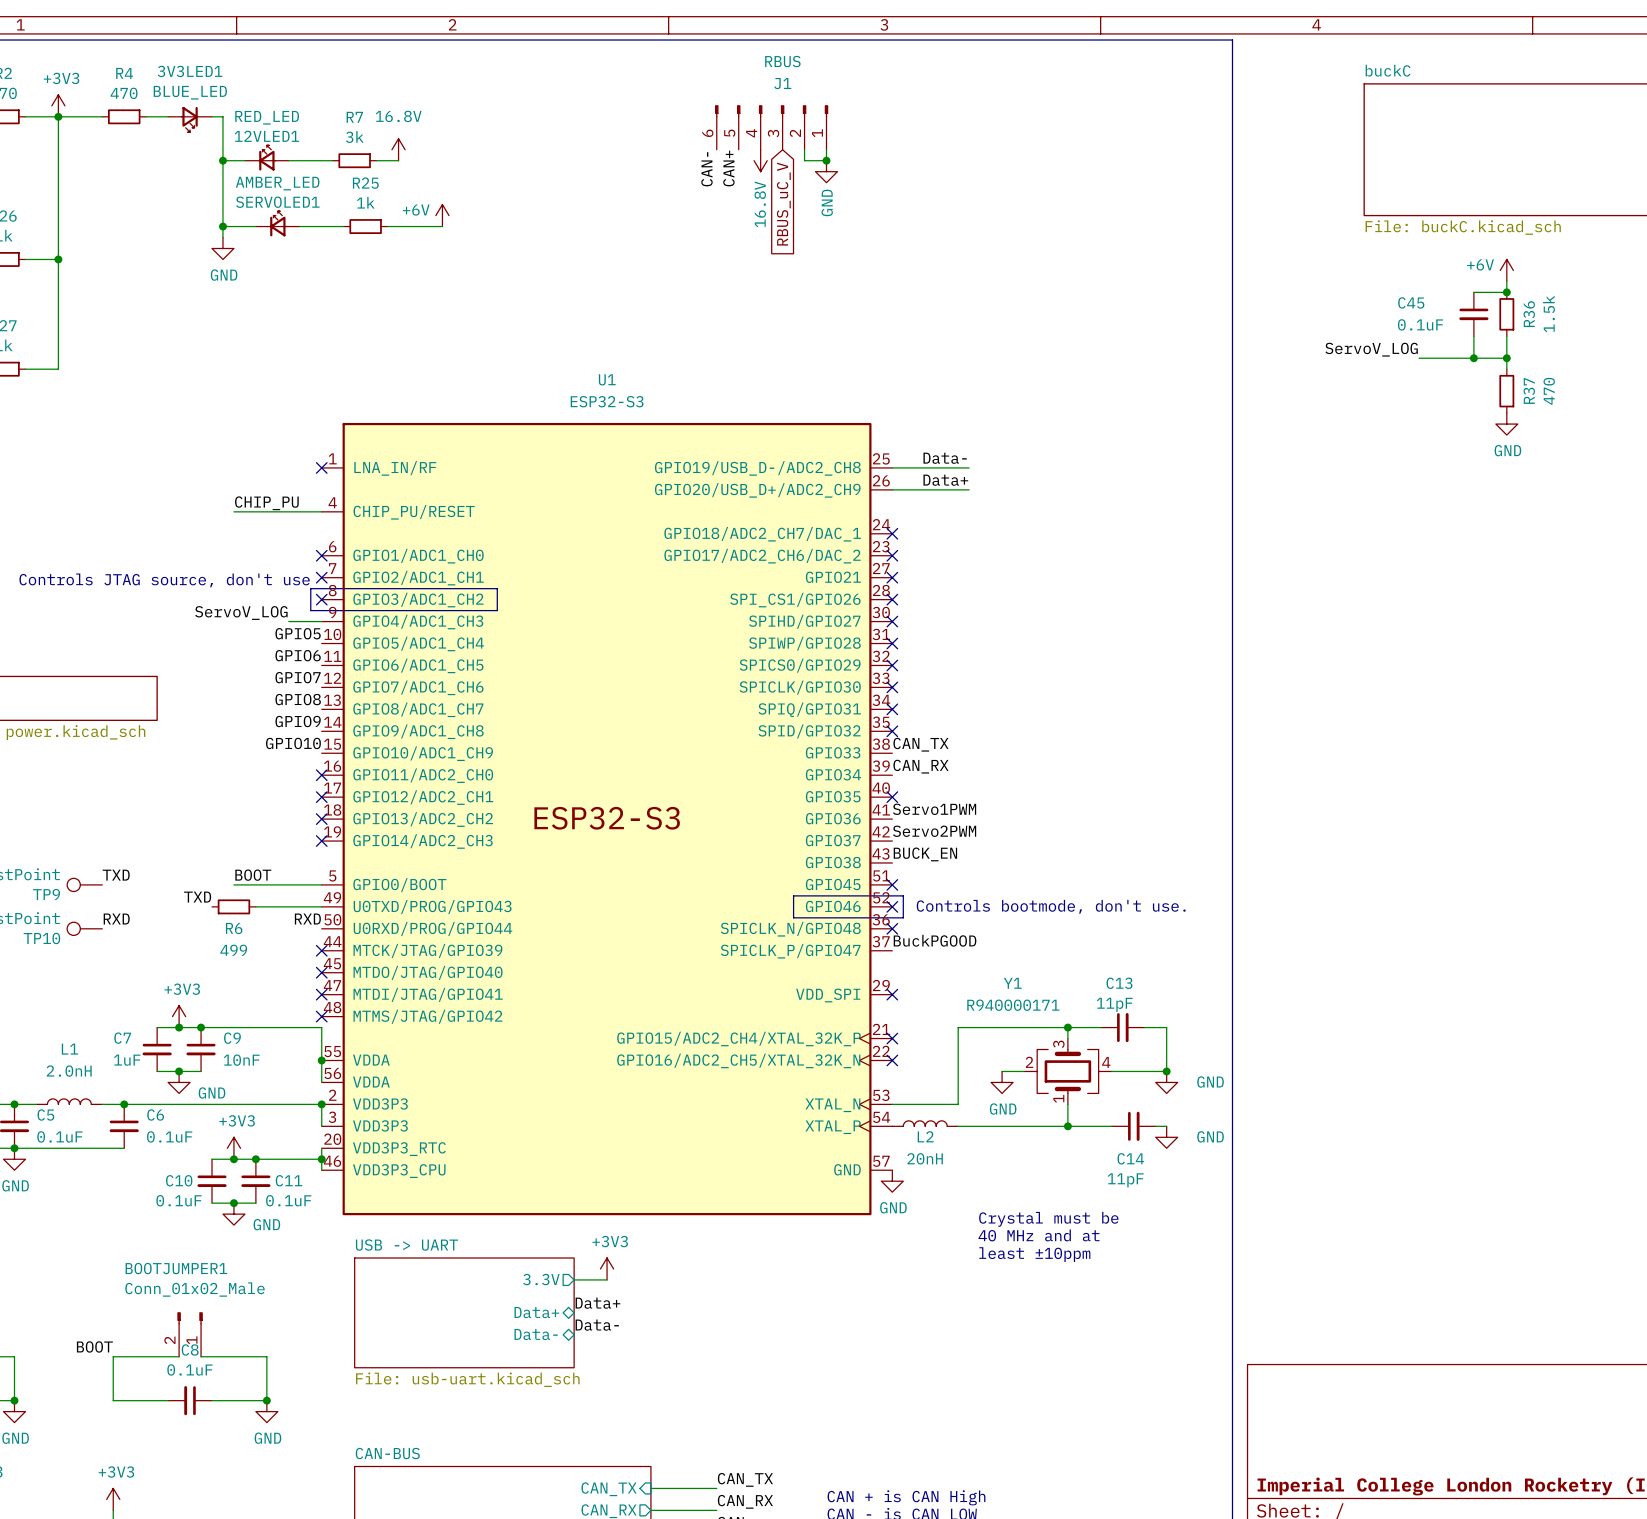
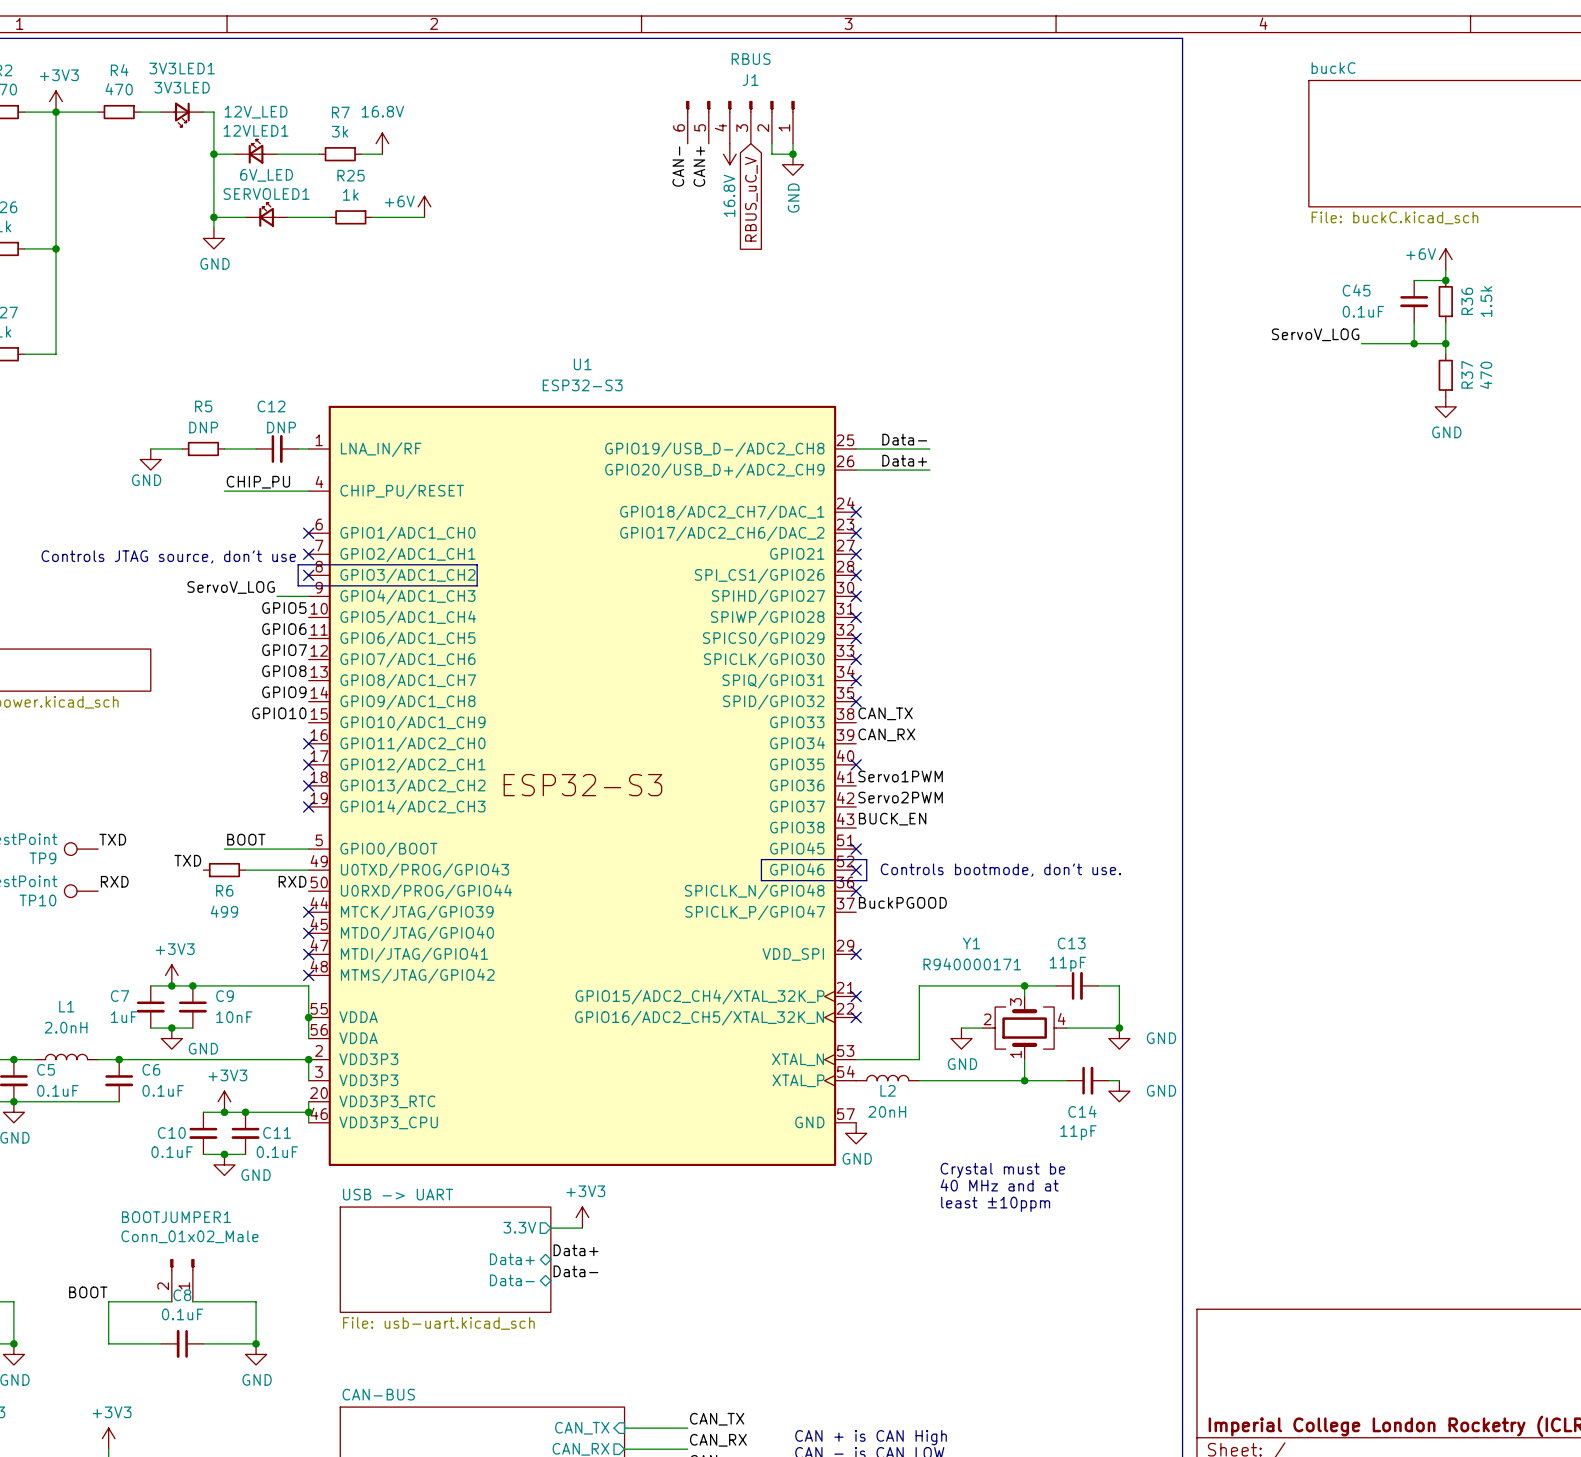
3V3LED1 value: BLUE_LED (190, 92) -> 3V3LED (182, 87)
12VLED1 value: RED_LED (267, 117) -> 12V_LED (256, 112)
SERVOLED1 value: AMBER_LED (277, 183) -> 6V_LED (266, 175)
wire: none -> (150, 448) (182, 448)
R5: none -> DNP (203, 448)
wire: none -> (224, 448) (256, 448)
C12: none -> DNP (277, 448)
wire: none -> (298, 448) (308, 448)
no-connect mark: (321, 467) -> none
power symbol: none -> GND (150, 459)

